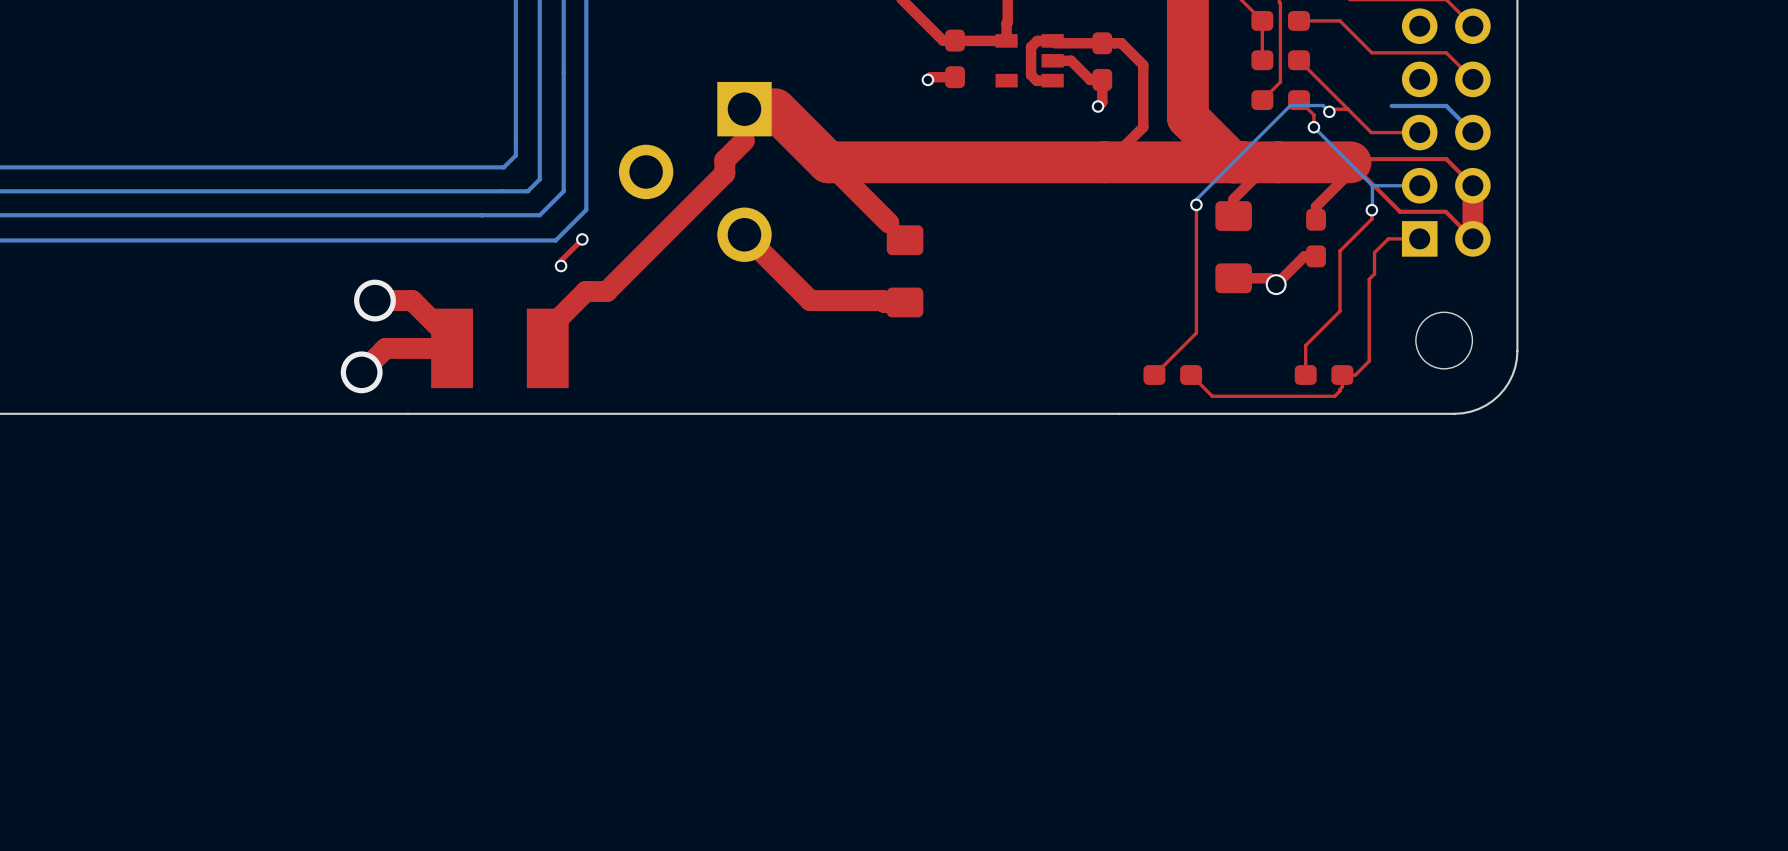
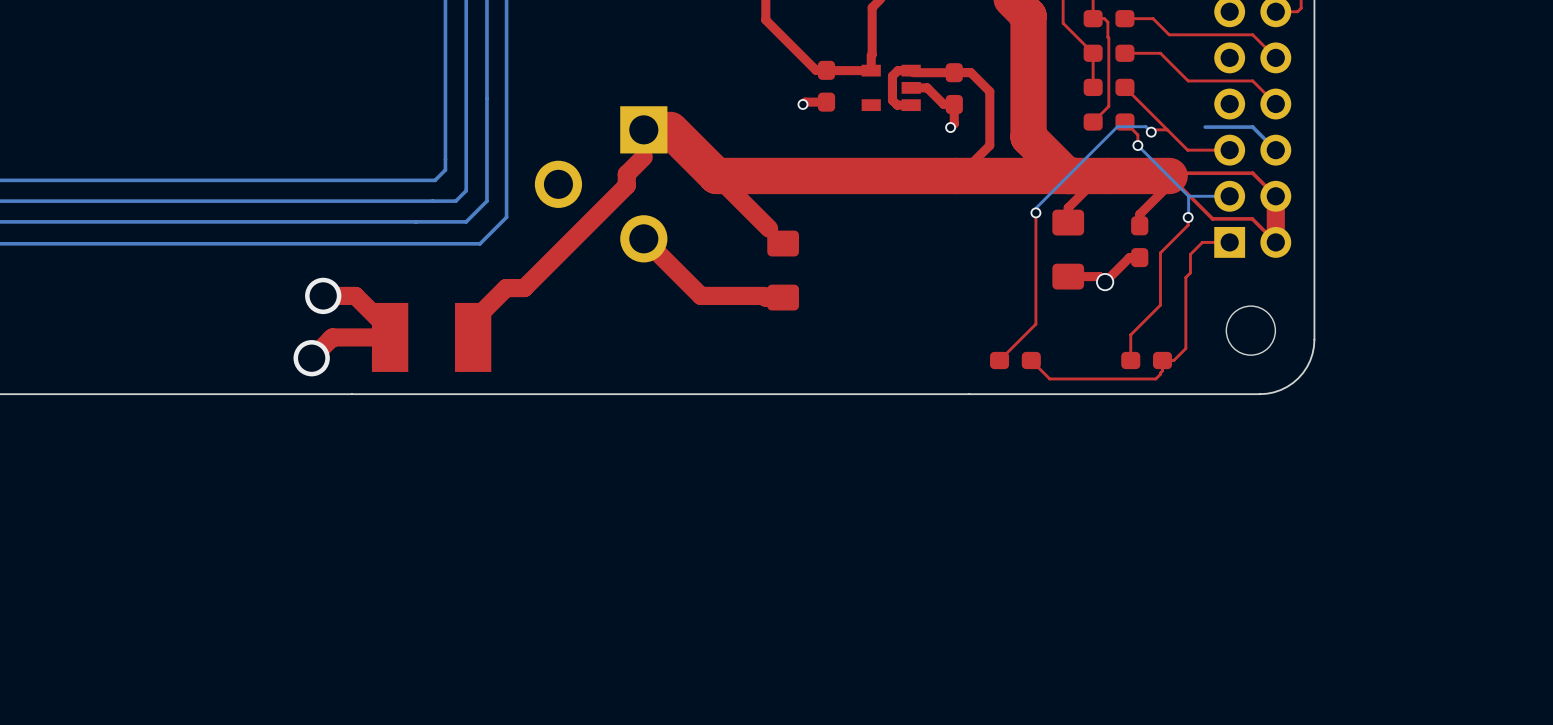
top track: (582, 239) (561, 260) (561, 266) -> none
via: (582, 239) -> none
via: (561, 266) -> none

